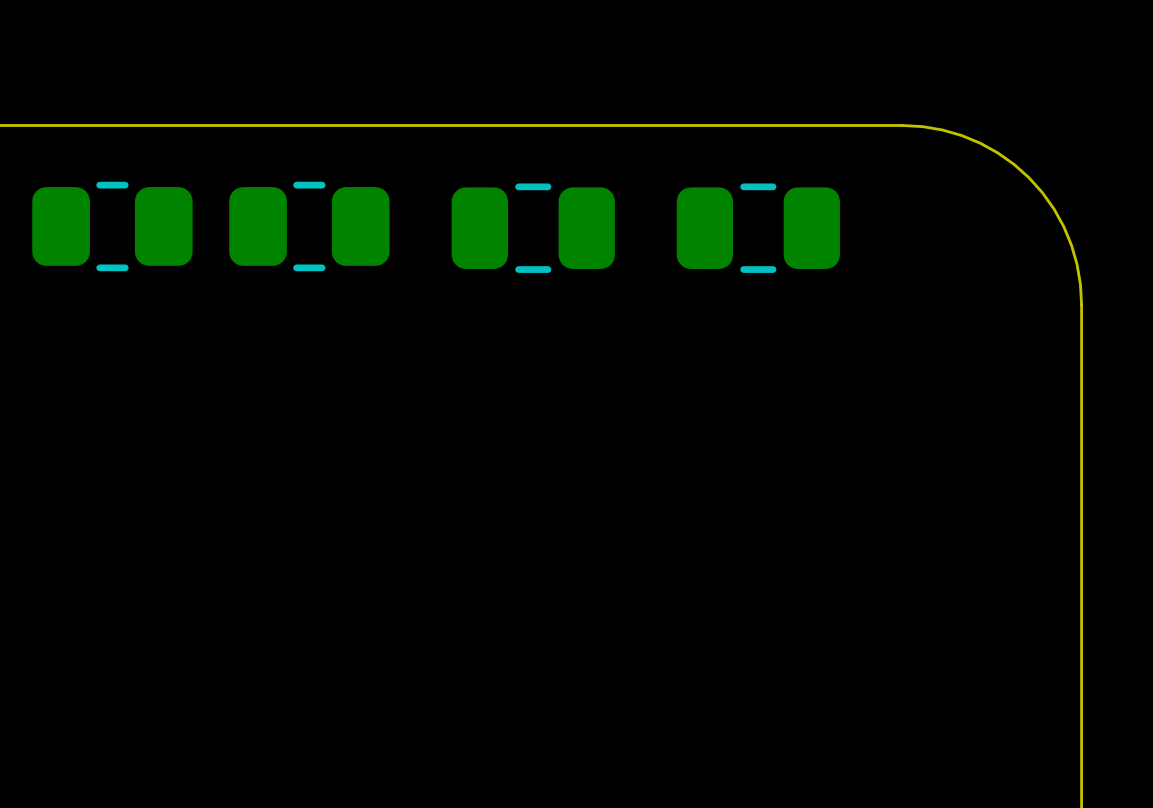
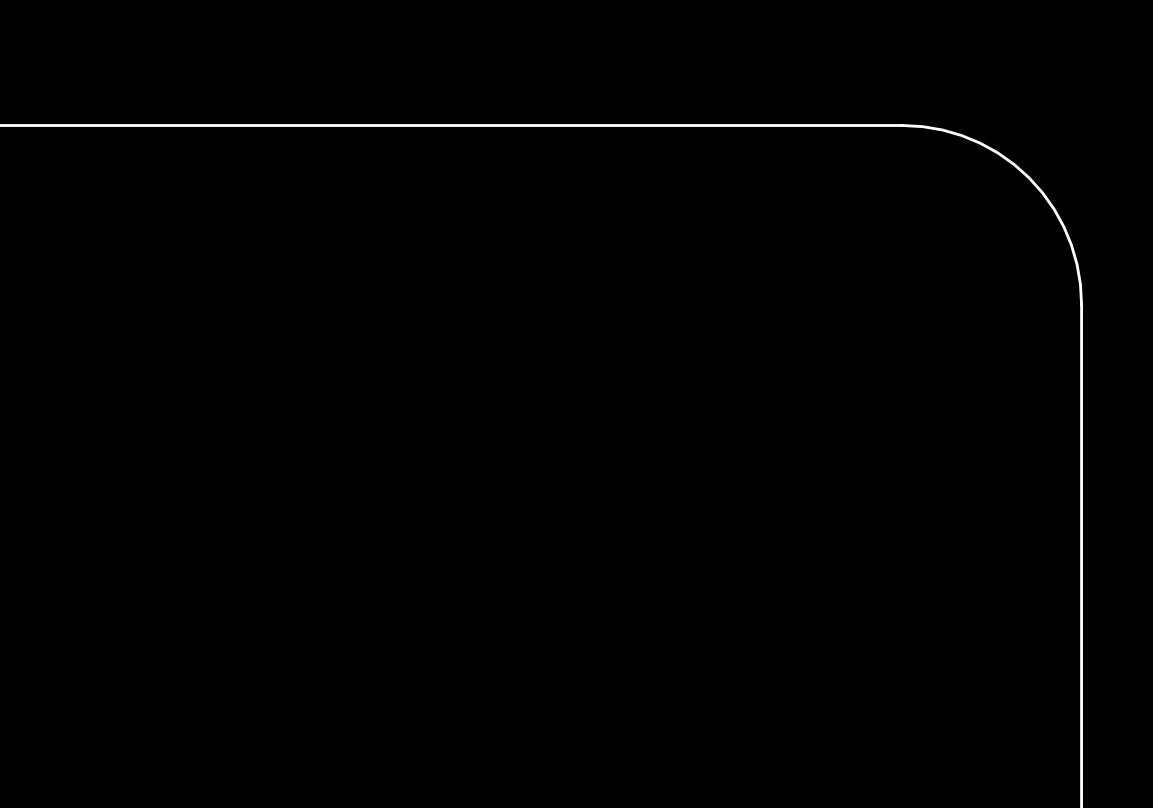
part: (112, 226) -> none
part: (309, 226) -> none
part: (533, 228) -> none
part: (758, 228) -> none

